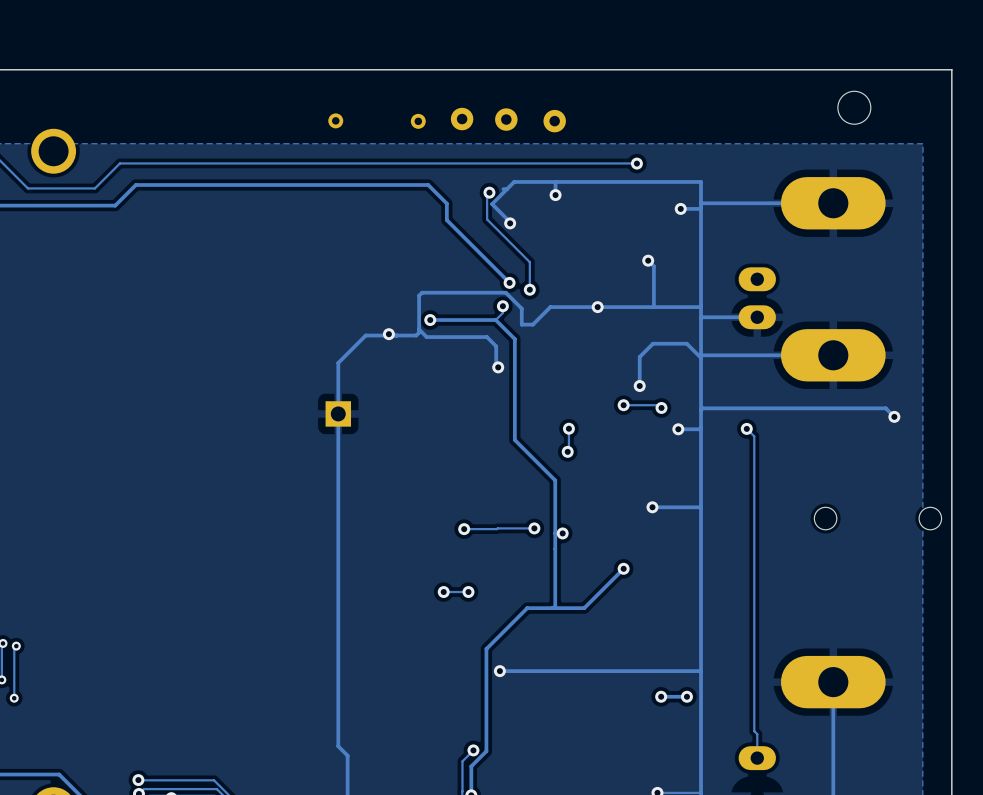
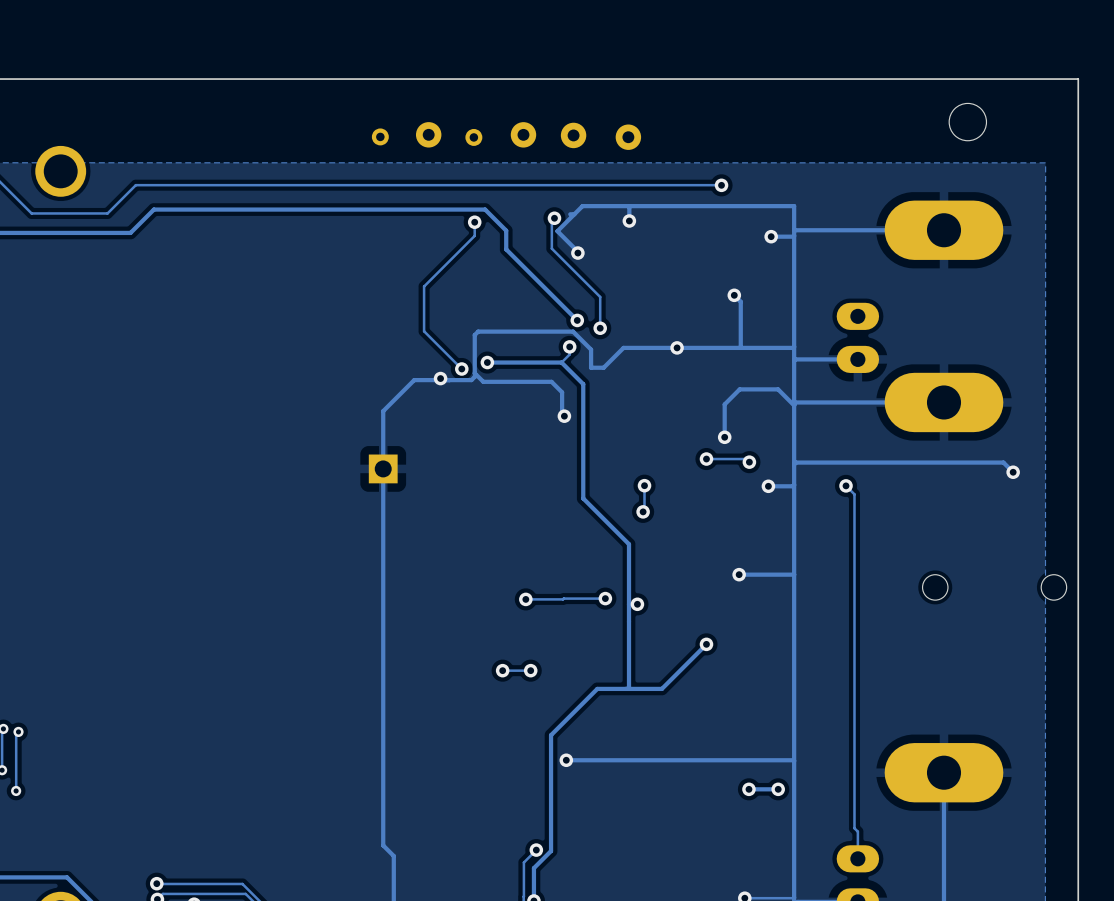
part: none -> (428, 134)
track: none -> (474, 222) (474, 235) (424, 286) (424, 331) (461, 369)
via: none -> (474, 222)
via: none -> (461, 369)

